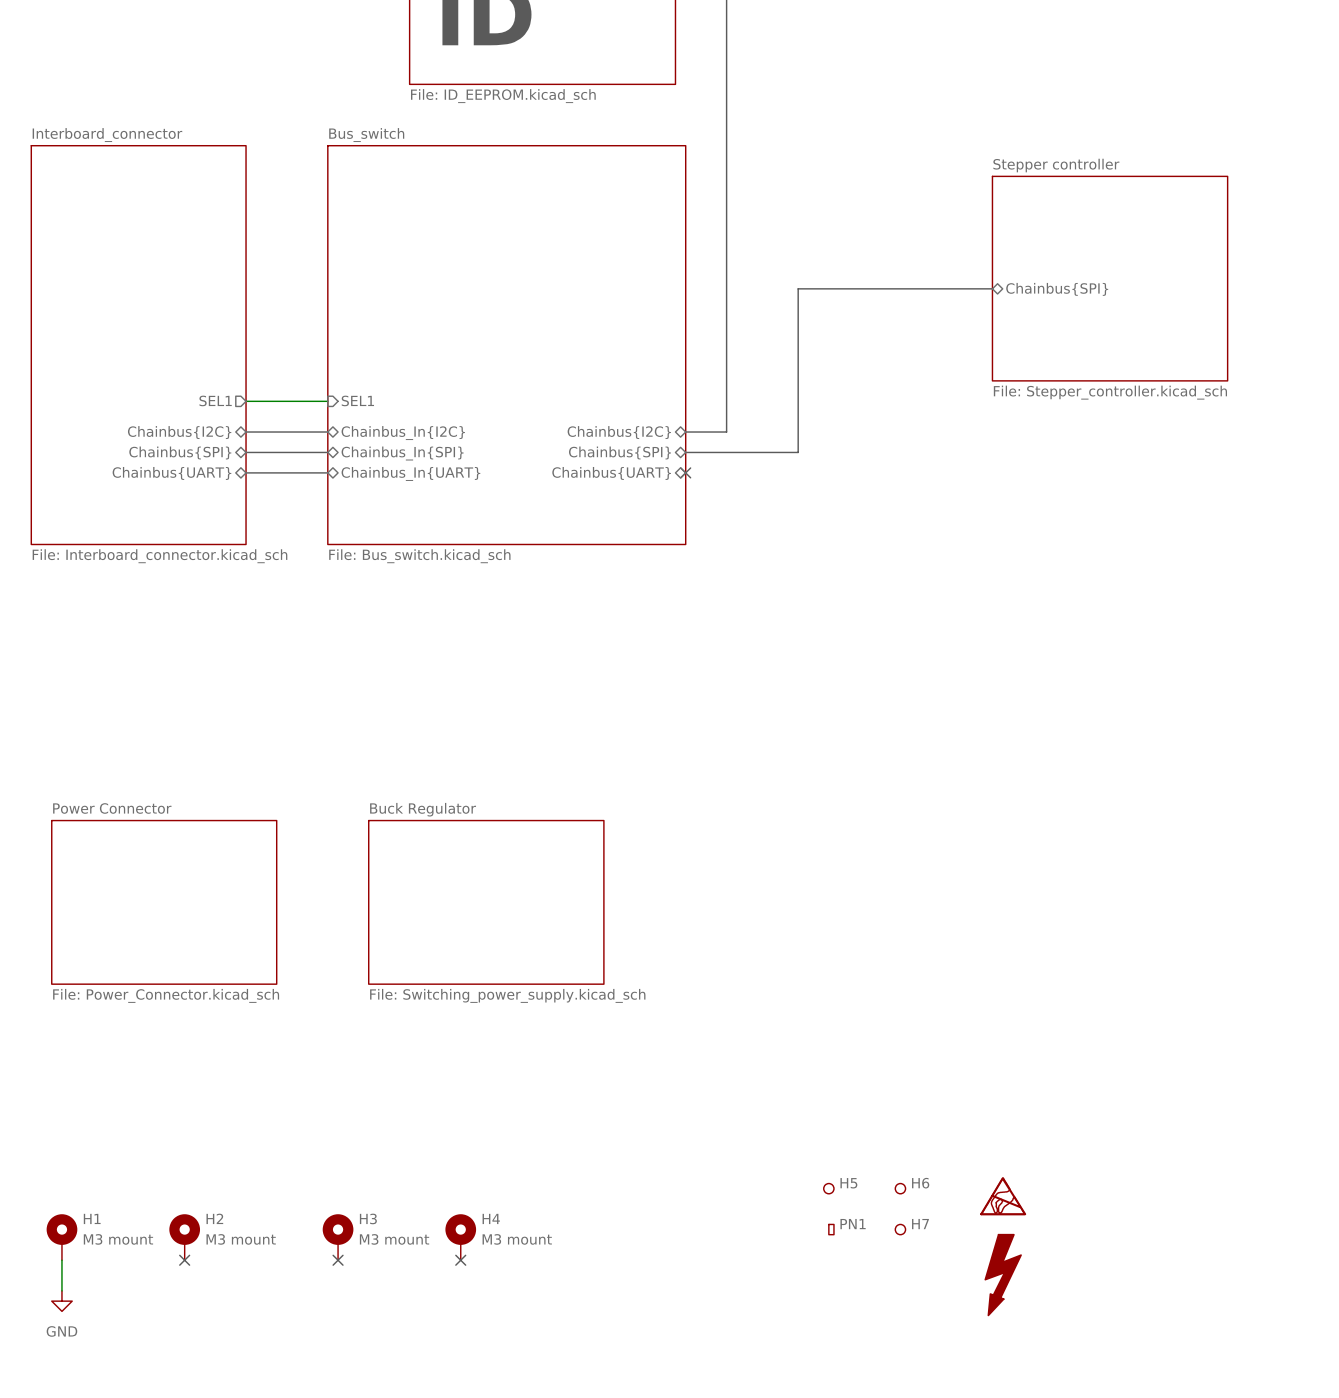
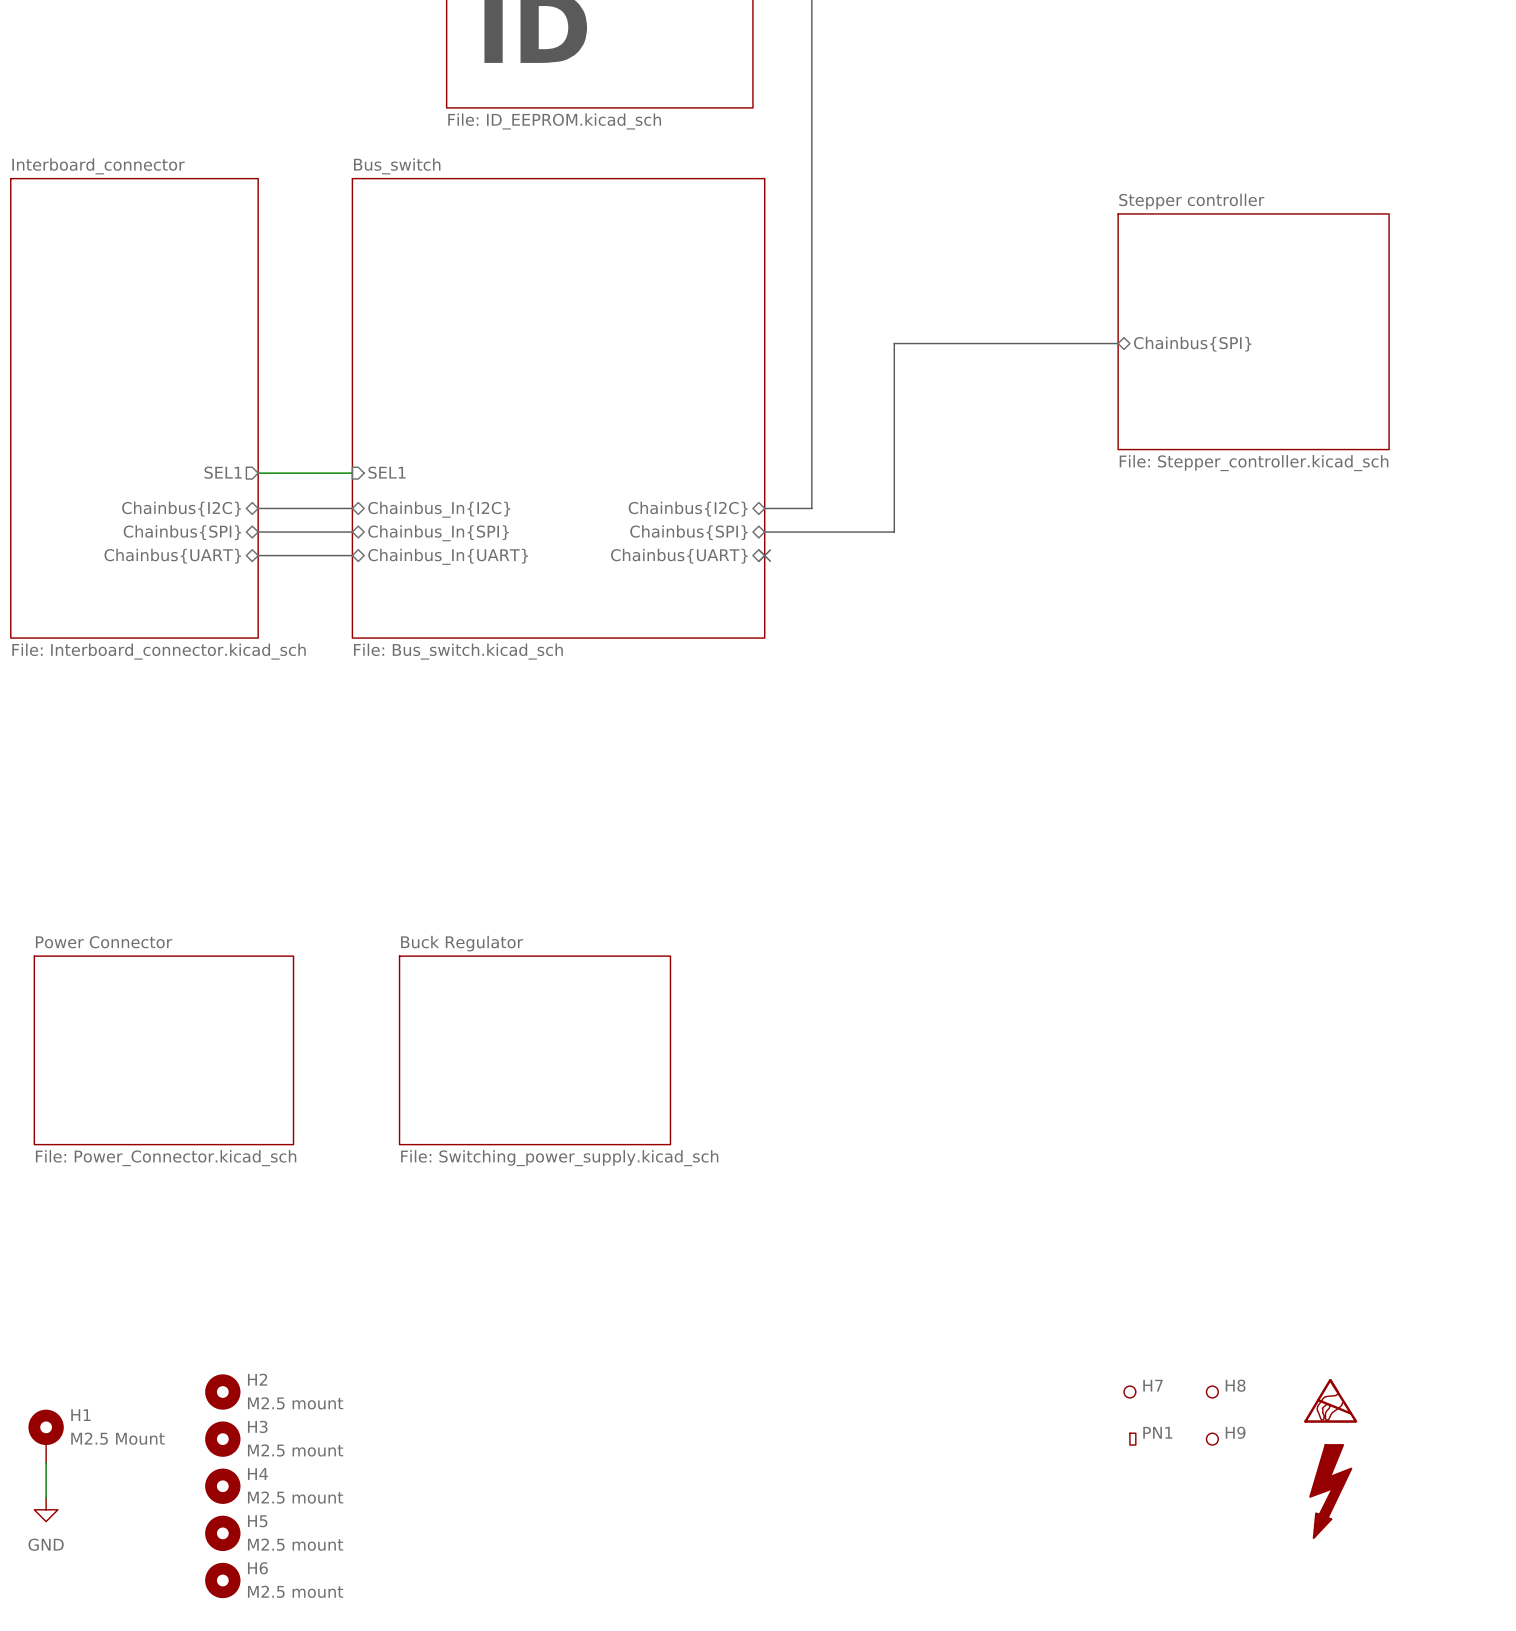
H5 symbol: [823, 1183, 834, 1194] -> [205, 1515, 241, 1552]
H6 symbol: [895, 1183, 906, 1194] -> [205, 1562, 241, 1599]
power symbol position: (1003, 1196) -> (1330, 1400)
H8: none -> (1212, 1392)
H2 symbol: [169, 1214, 201, 1261] -> [205, 1374, 241, 1410]
H3 symbol: [322, 1214, 354, 1261] -> [205, 1421, 241, 1457]
H4 symbol: [445, 1214, 477, 1261] -> [205, 1468, 241, 1504]
PN1 position: (831, 1229) -> (1132, 1439)
H7 position: (900, 1229) -> (1129, 1392)
H1 value: M3 mount (118, 1239) -> M2.5 Mount (117, 1438)
H2 value: M3 mount (241, 1239) -> M2.5 mount (295, 1403)
H3 value: M3 mount (394, 1239) -> M2.5 mount (295, 1450)
H4 value: M3 mount (517, 1239) -> M2.5 mount (295, 1497)
H9: none -> (1212, 1439)
no-connect mark: (184, 1260) -> none
no-connect mark: (338, 1260) -> none
no-connect mark: (460, 1260) -> none
power symbol position: (1003, 1275) -> (1330, 1491)
H5 value: none -> M2.5 mount (295, 1544)
H6 value: none -> M2.5 mount (295, 1591)

